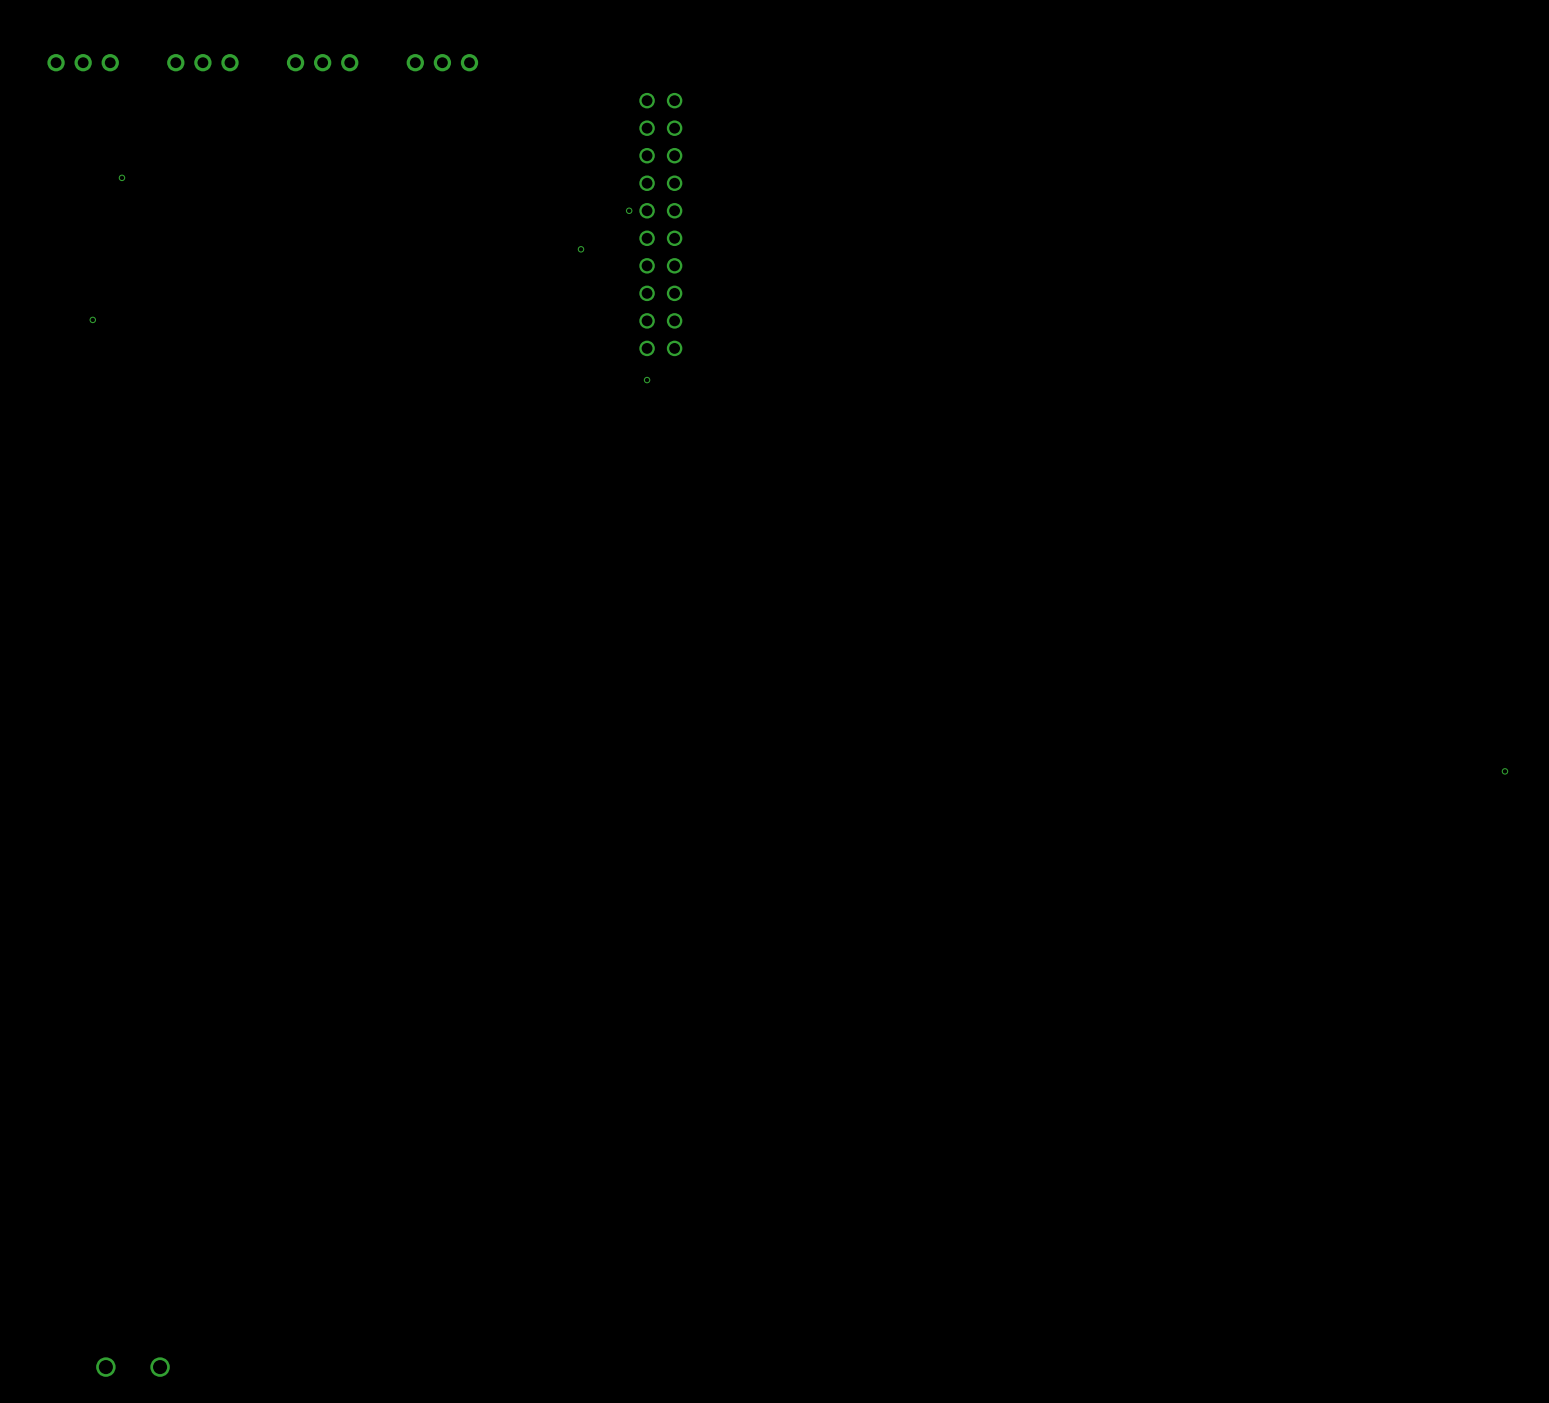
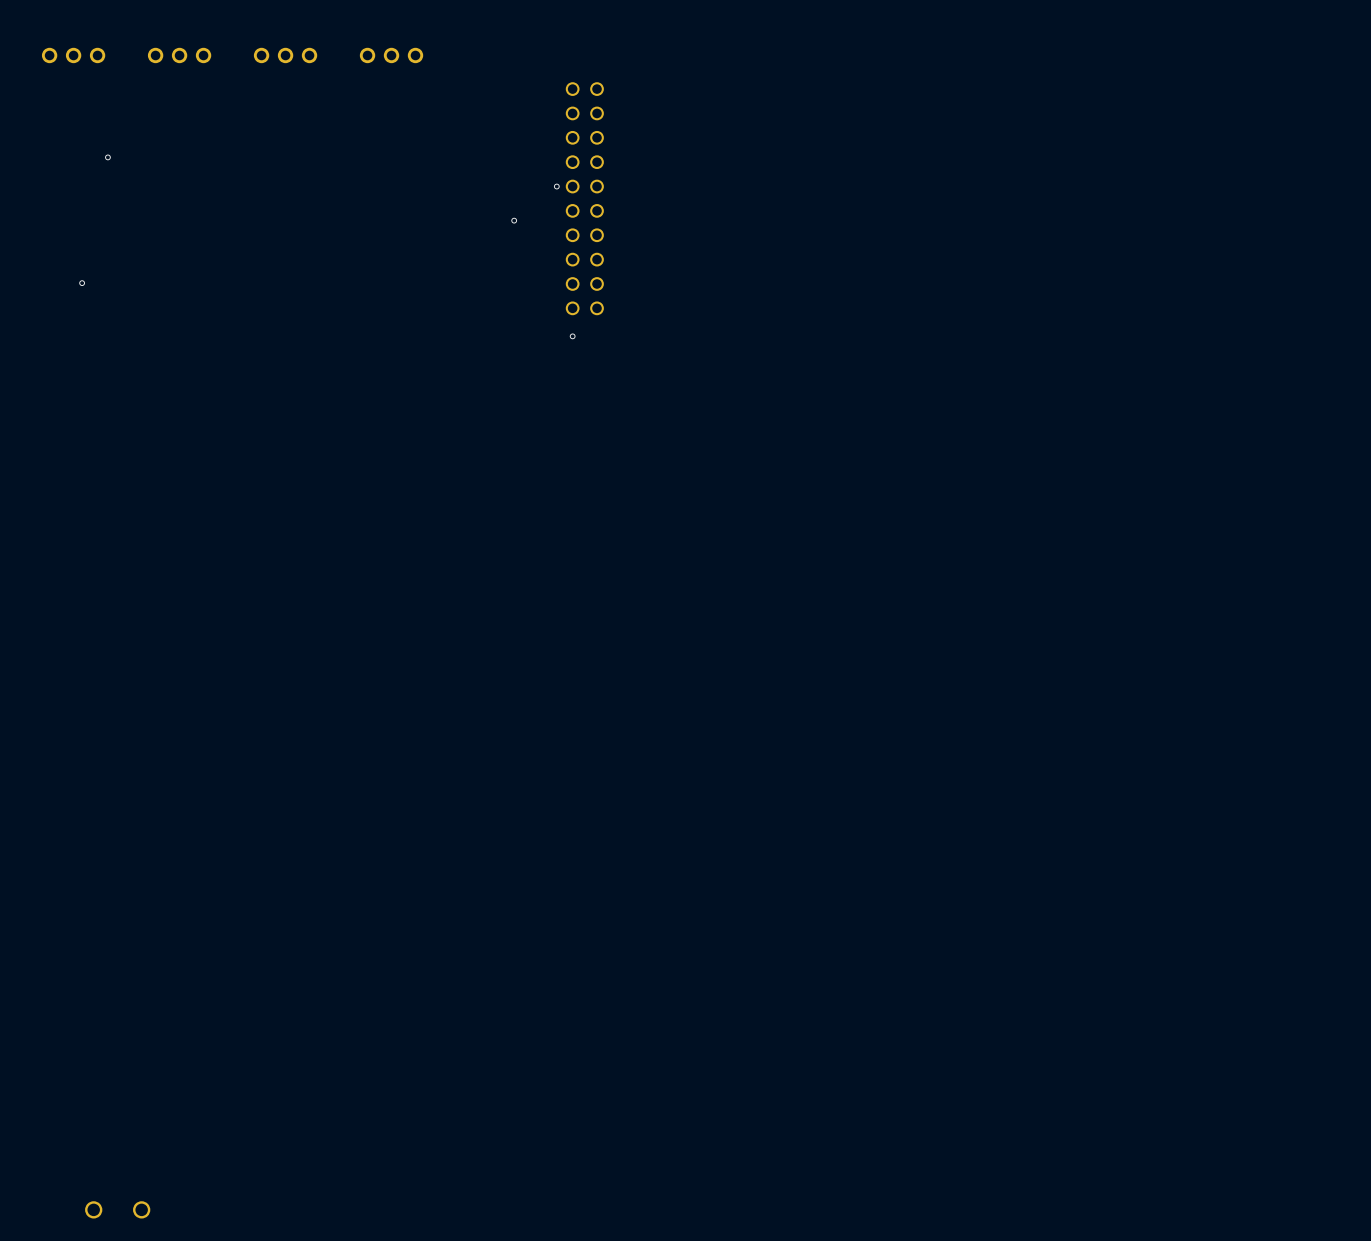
via: (1504, 771) -> none

